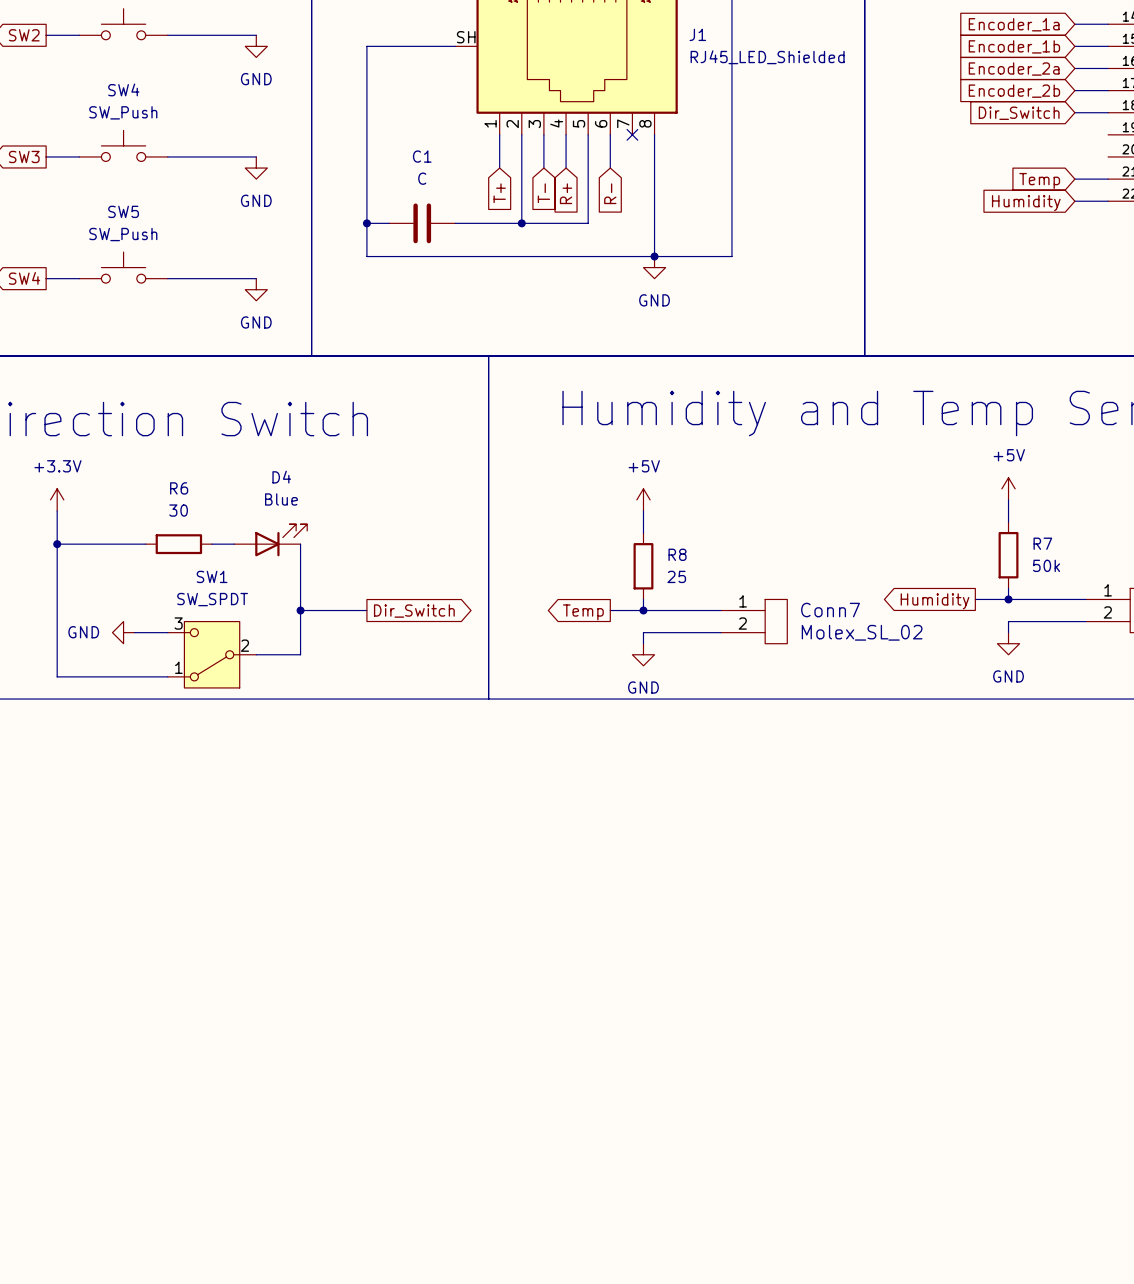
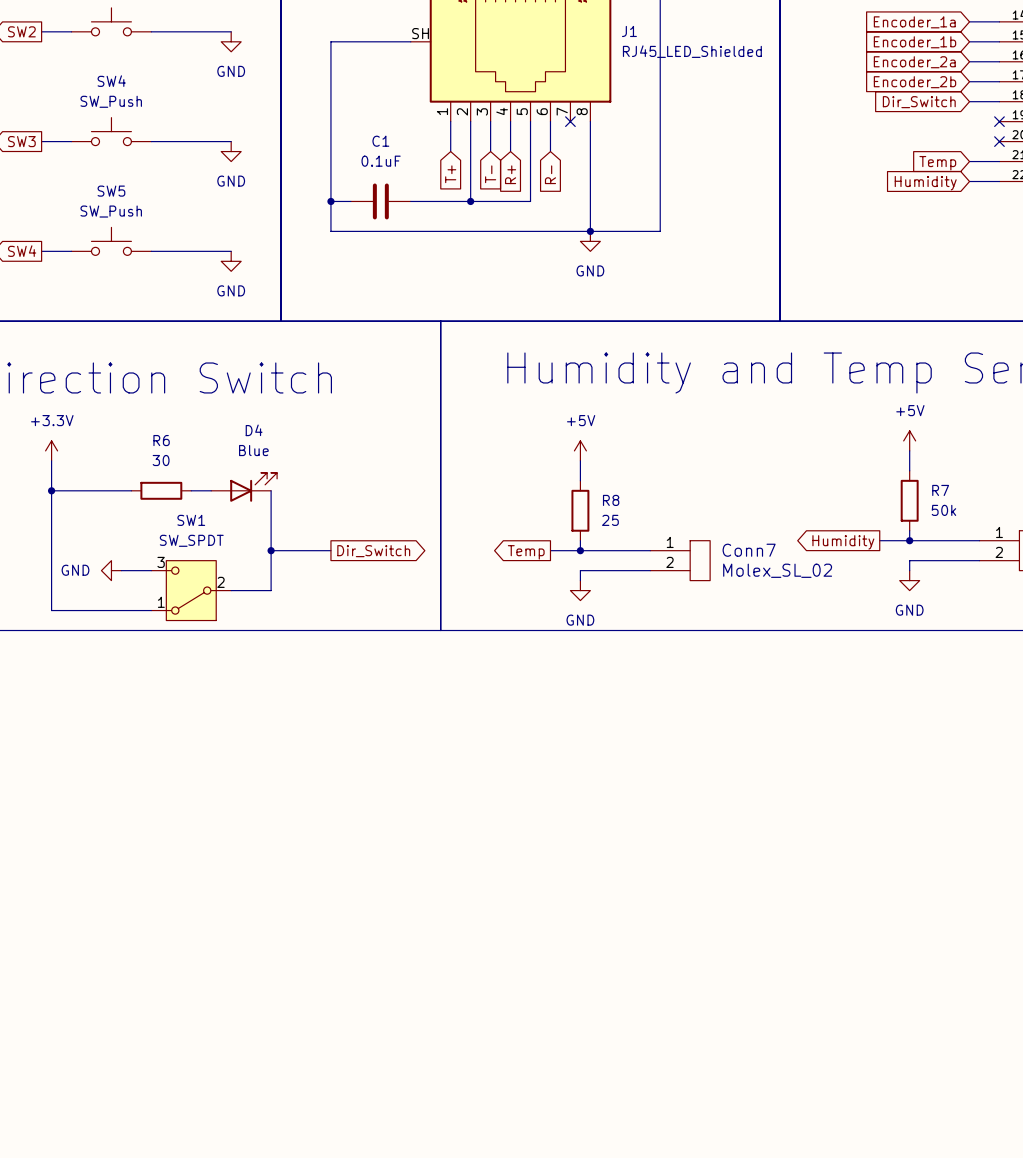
no-connect mark: none -> (999, 121)
no-connect mark: none -> (999, 141)
C1 value: C (422, 178) -> 0.1uF (381, 161)

